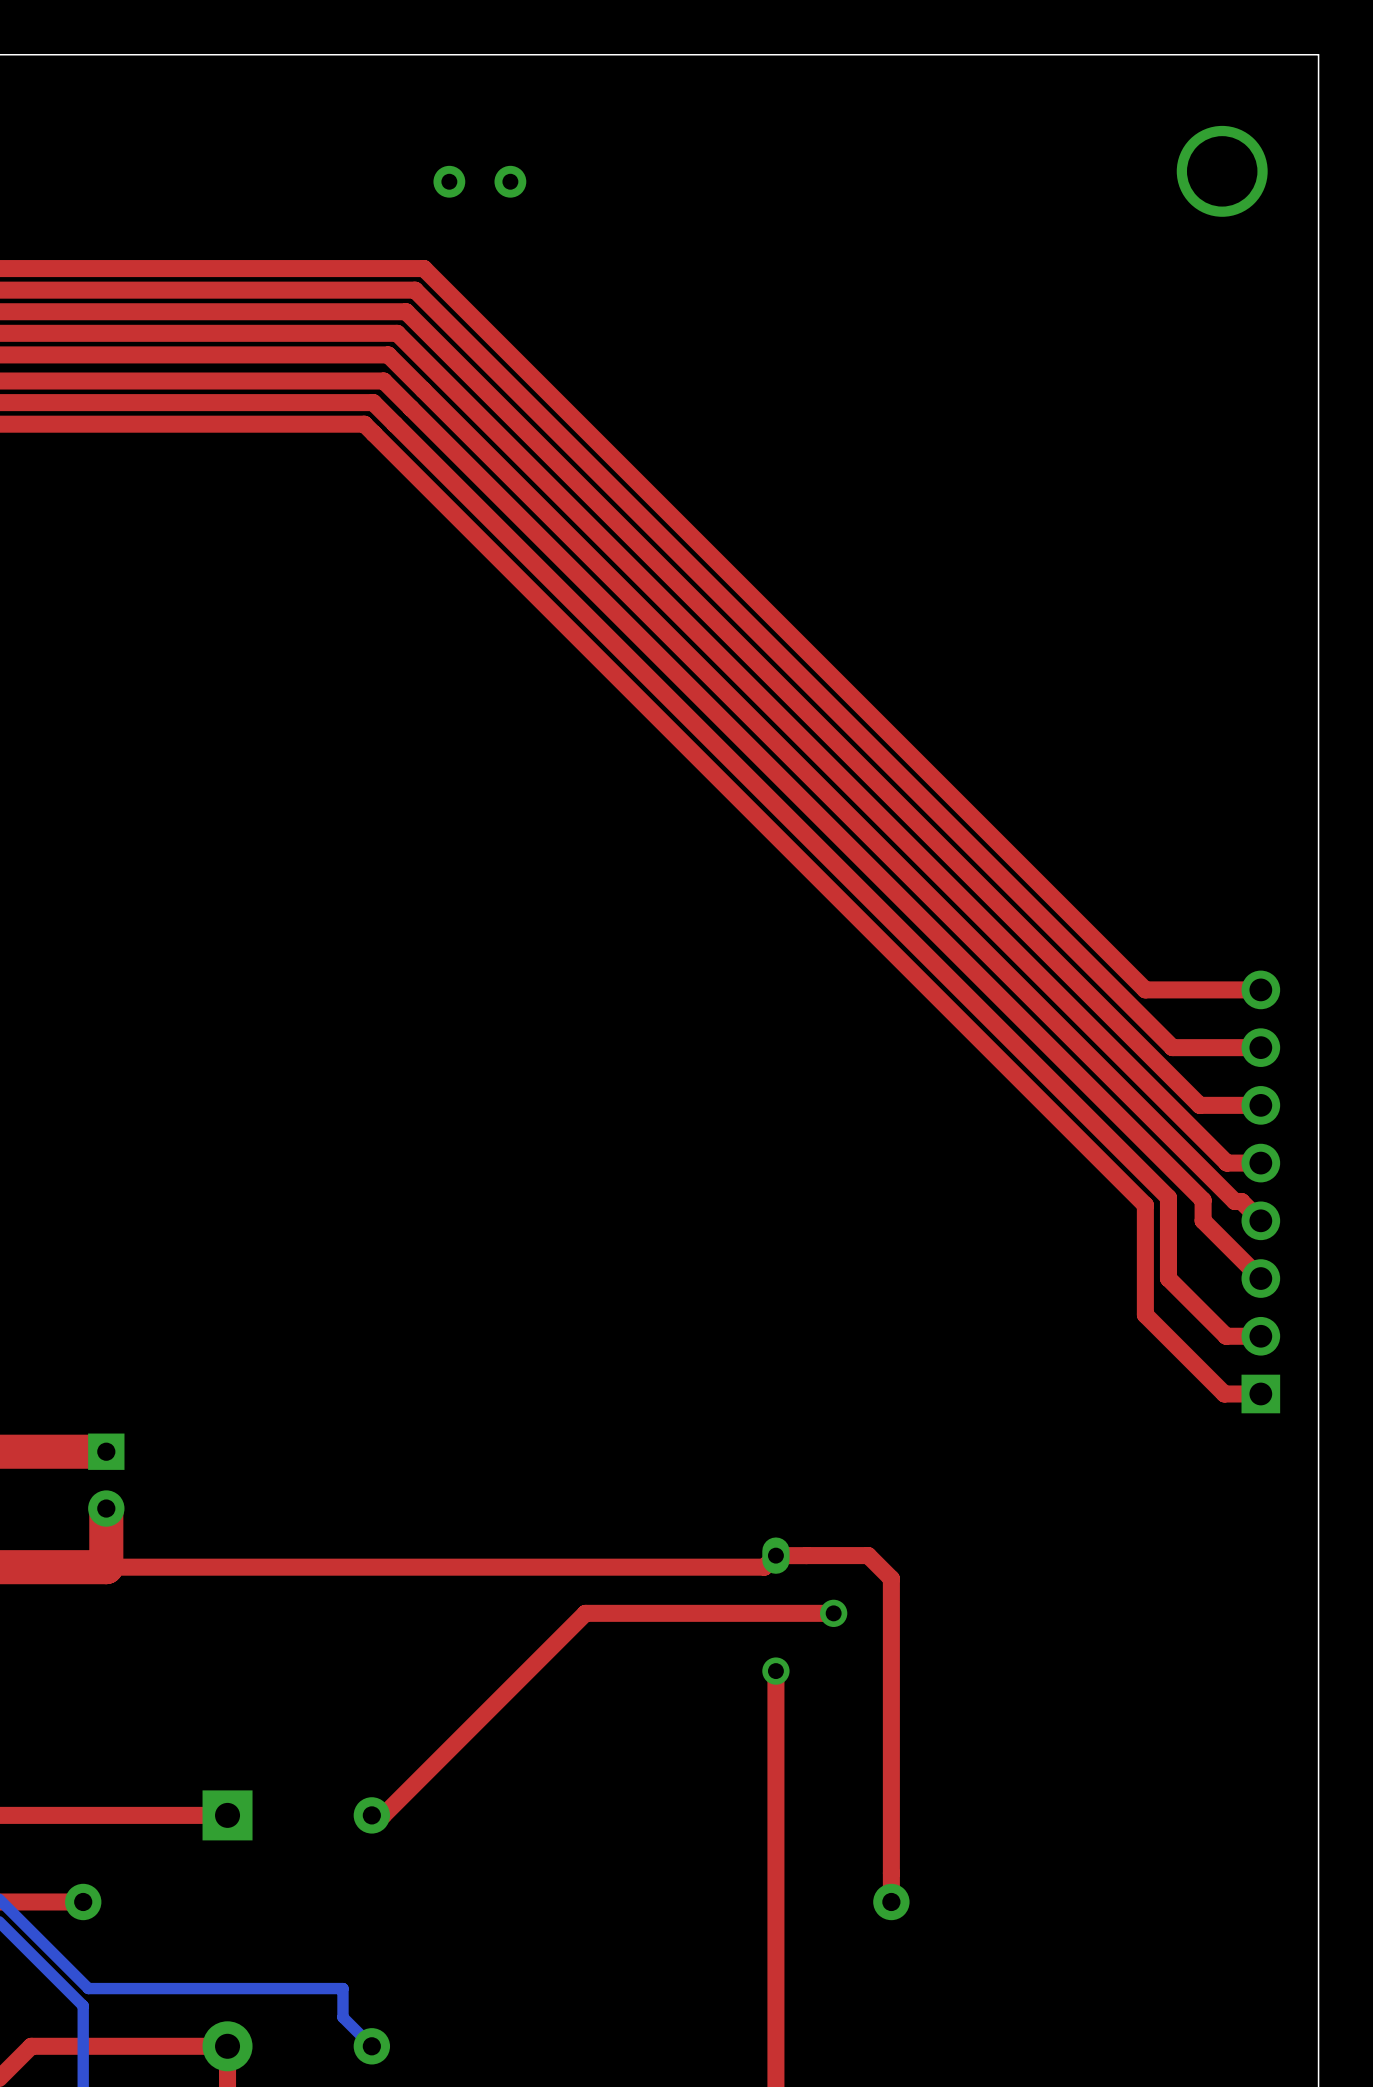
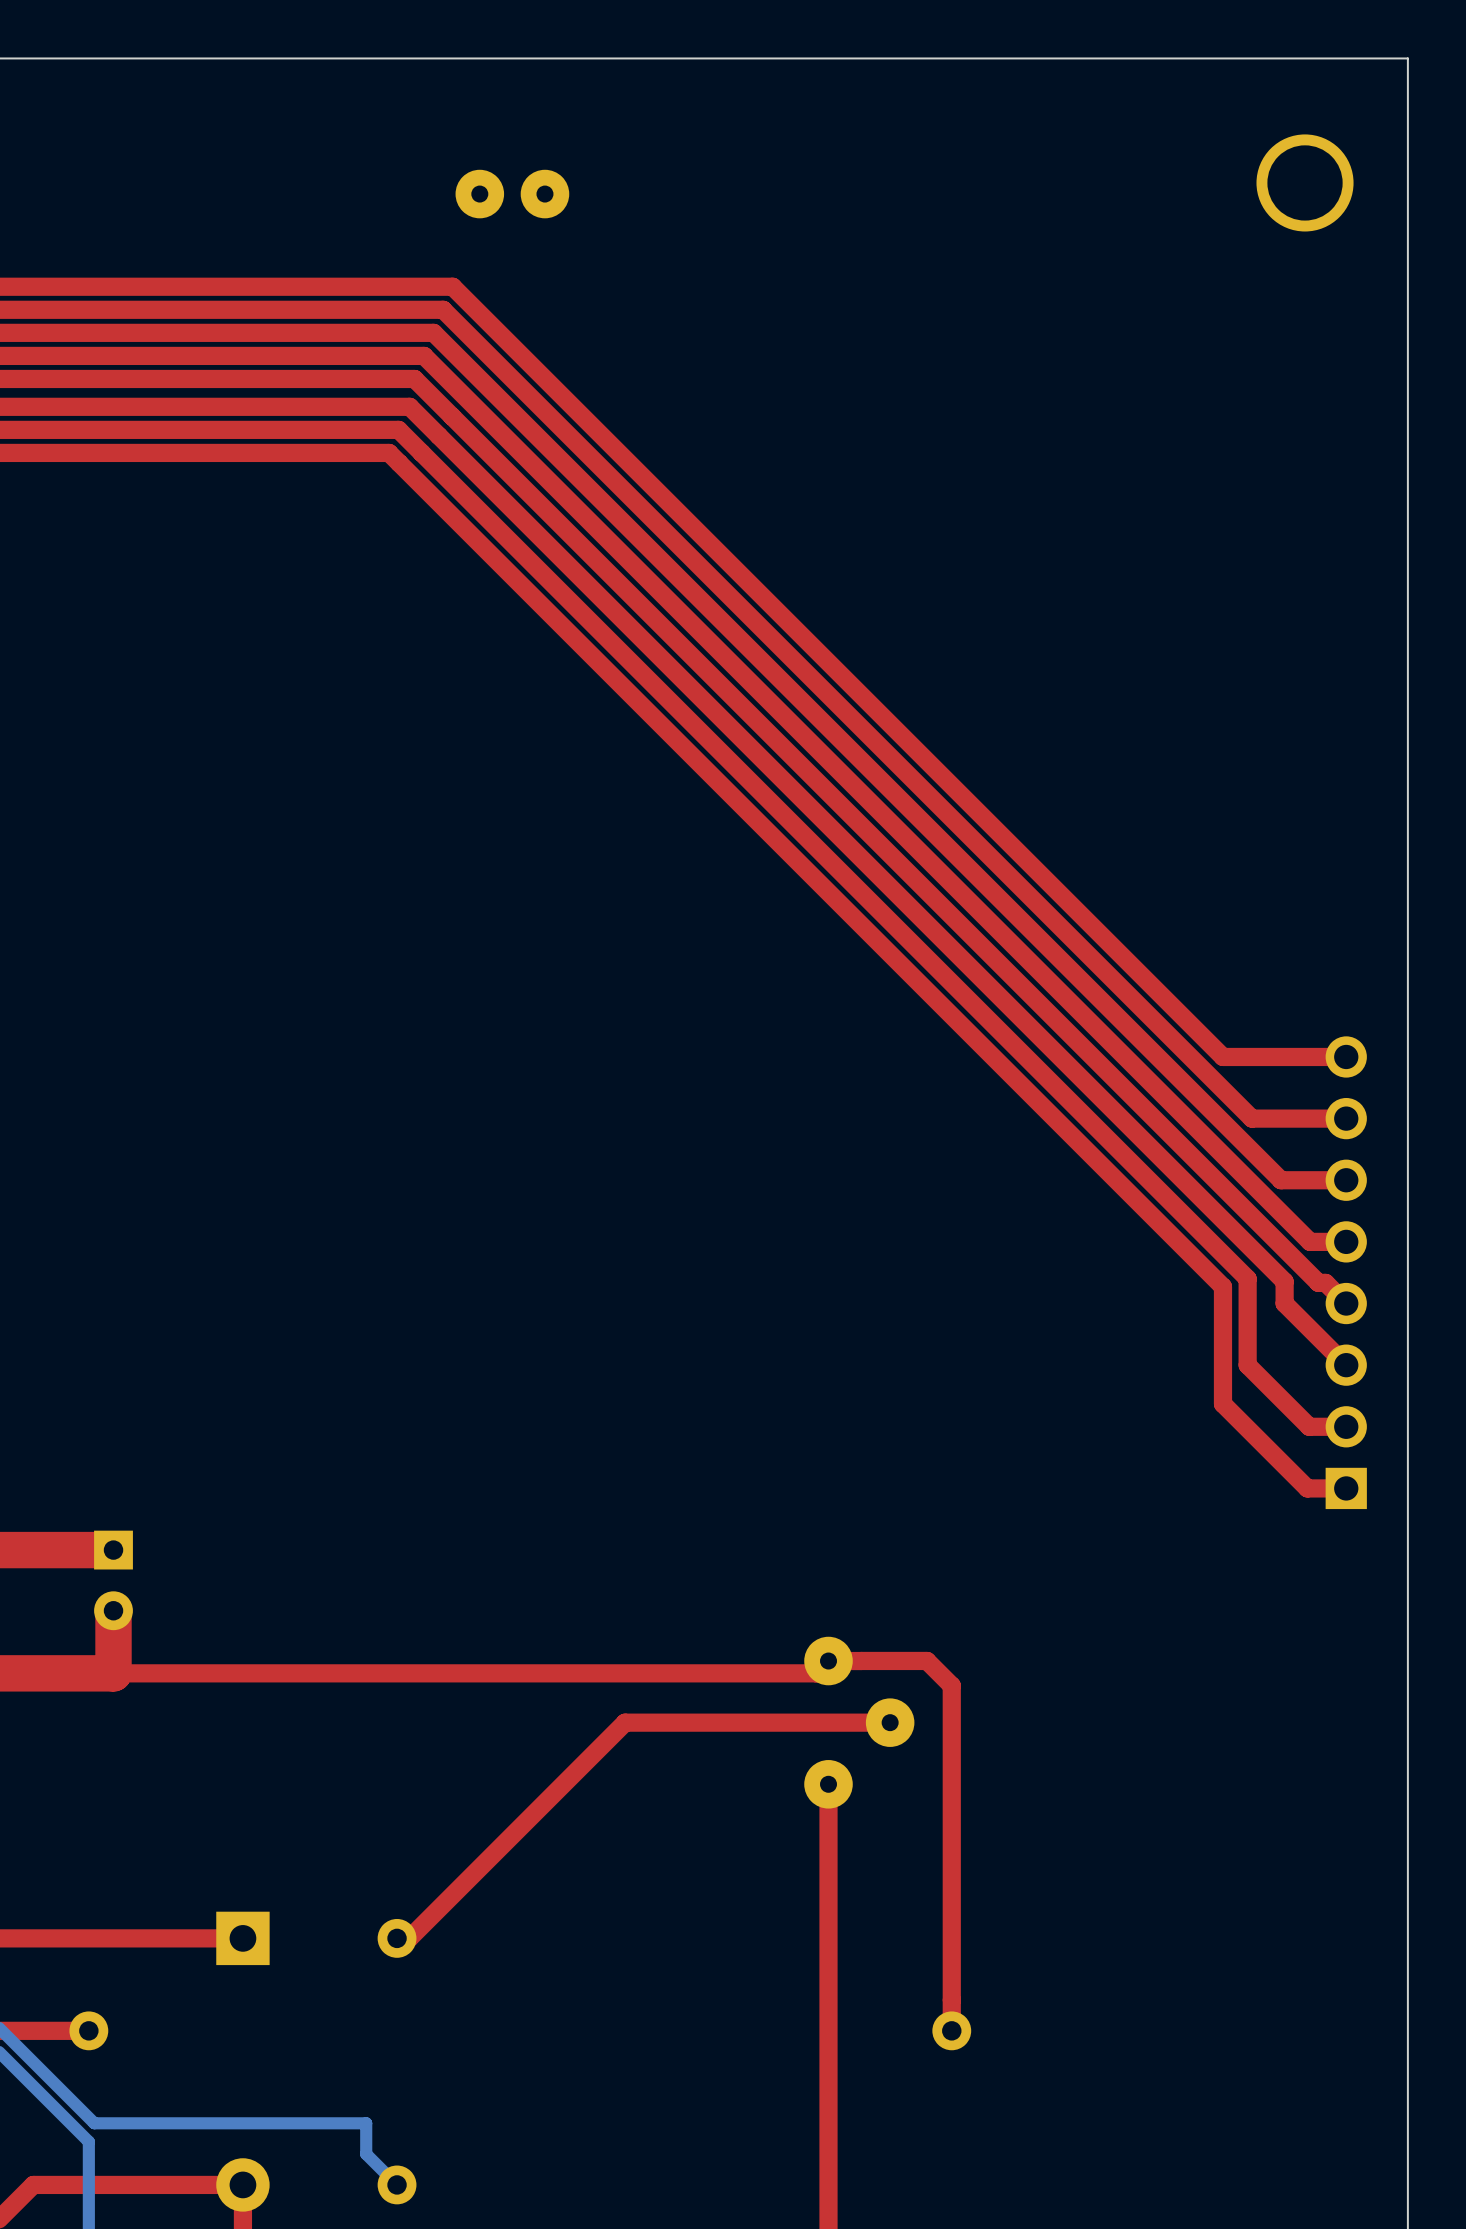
part footprint: [433, 165, 466, 198] -> [455, 169, 505, 219]
part footprint: [494, 165, 527, 198] -> [520, 169, 570, 219]
part footprint: [762, 1537, 848, 1685] -> [804, 1636, 915, 1809]

